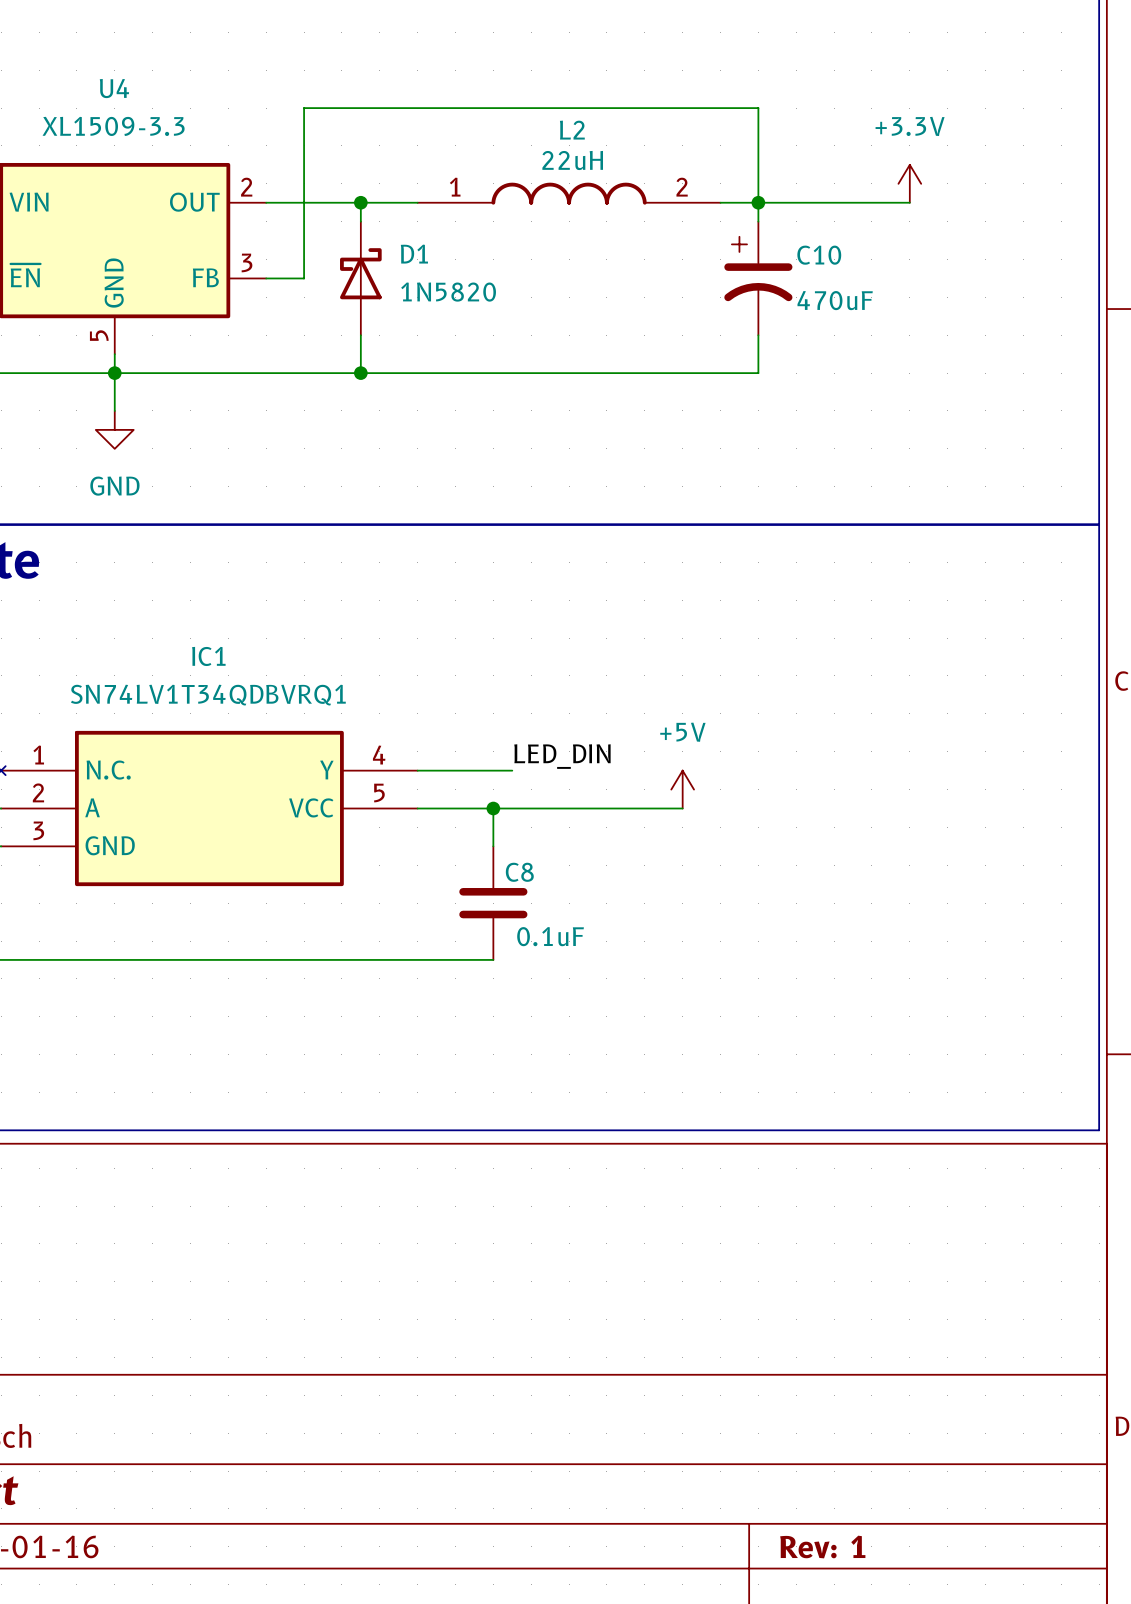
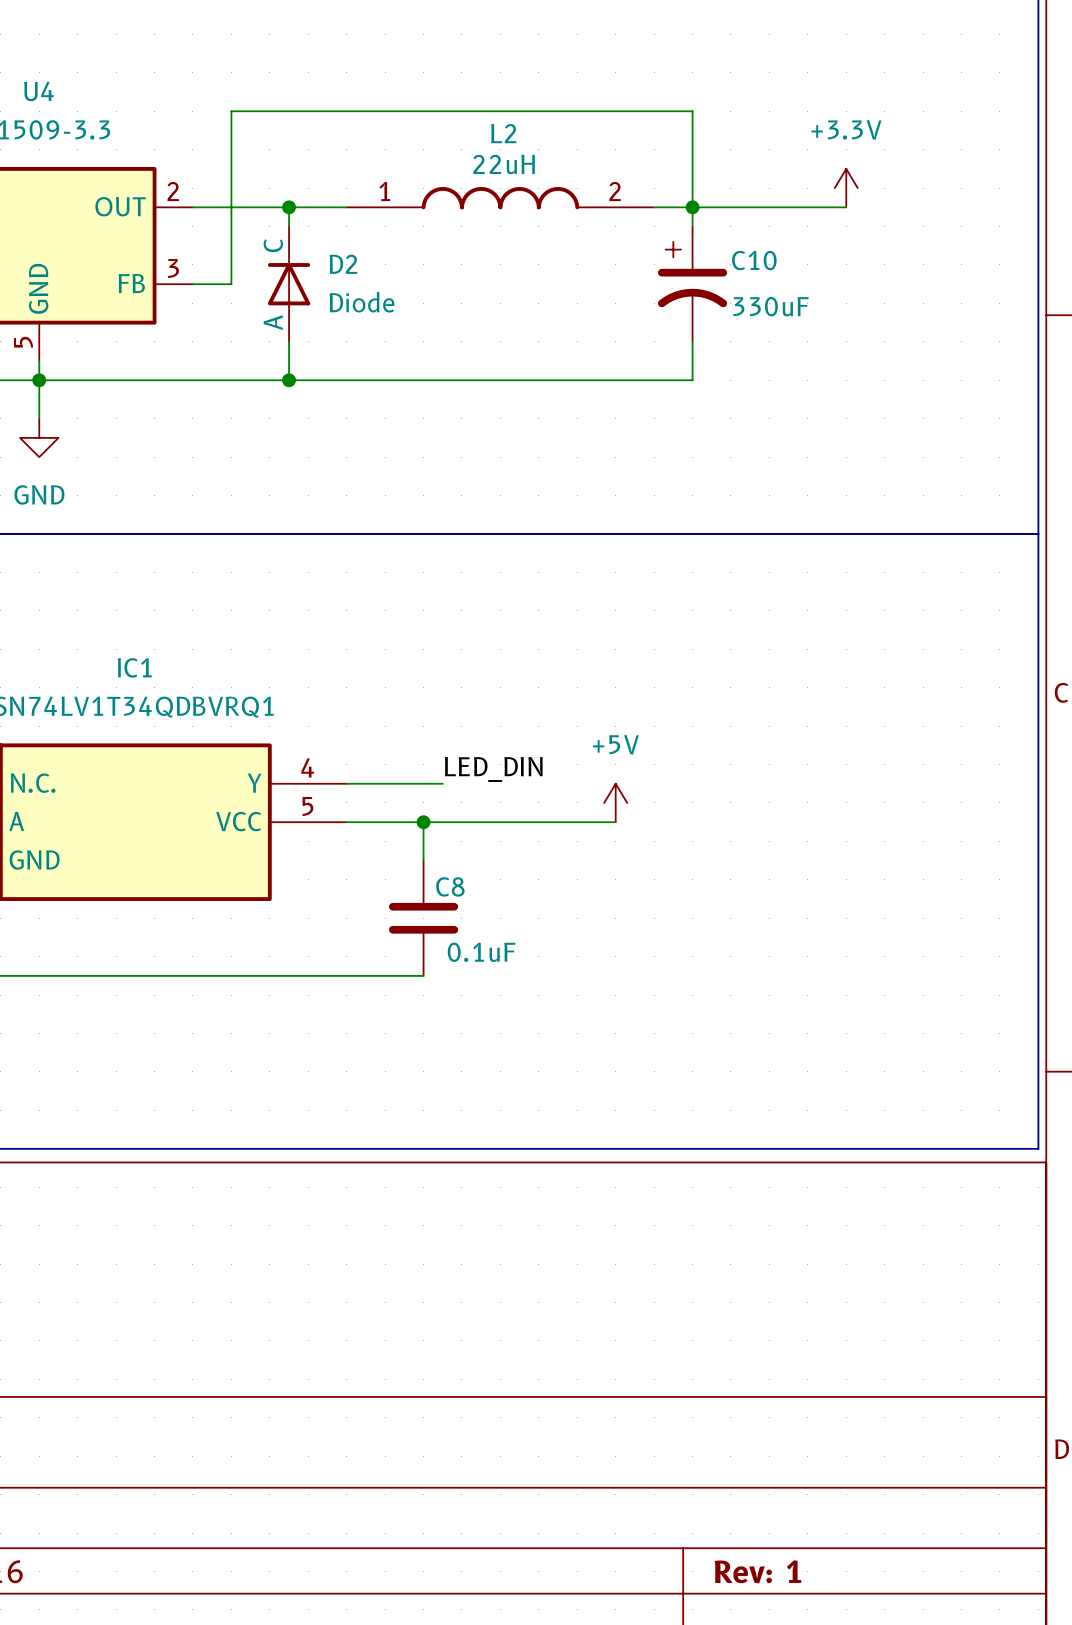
D1: 1N5820 (360, 278) -> none
D2: none -> Diode (289, 284)
C10 value: 470uF (835, 300) -> 330uF (771, 306)

